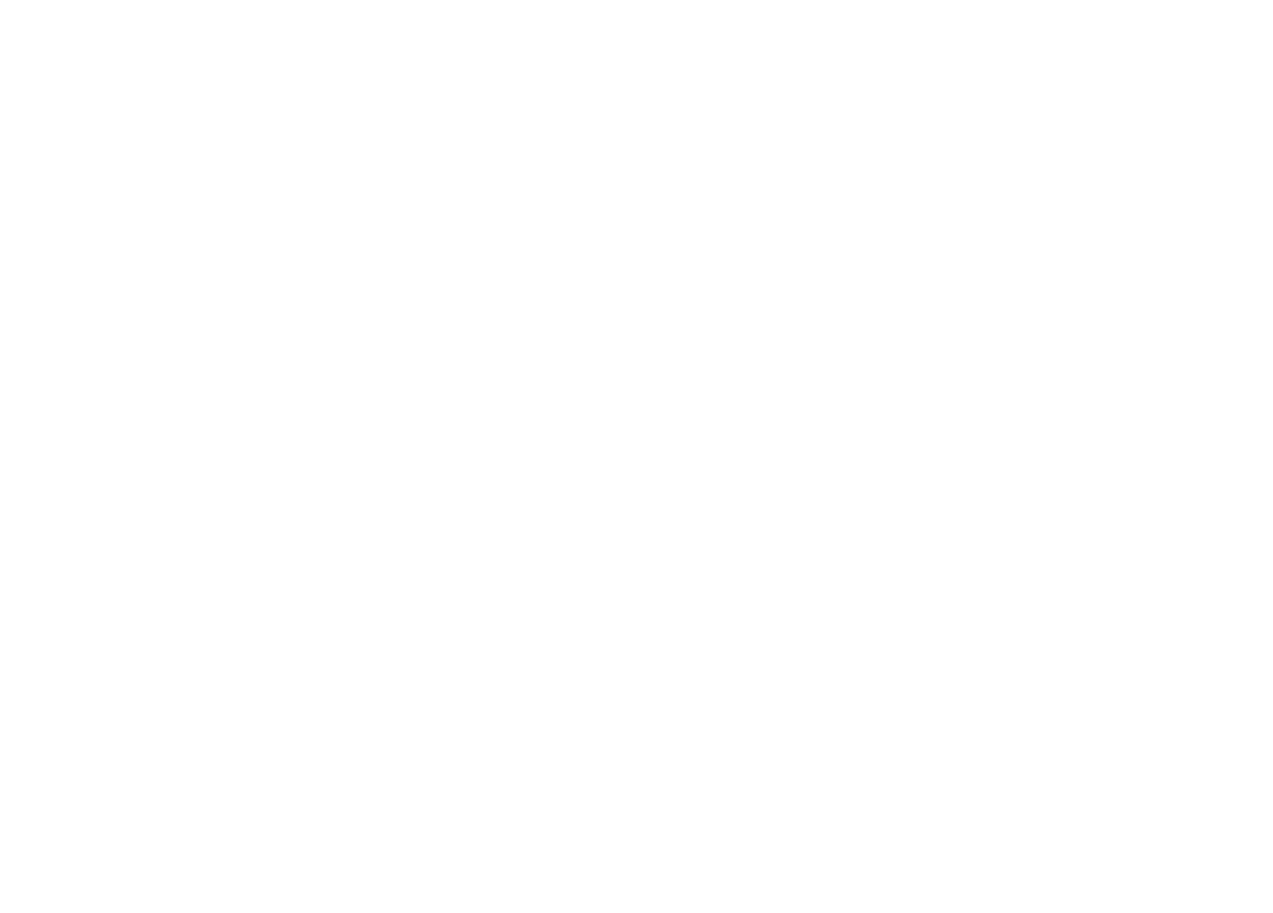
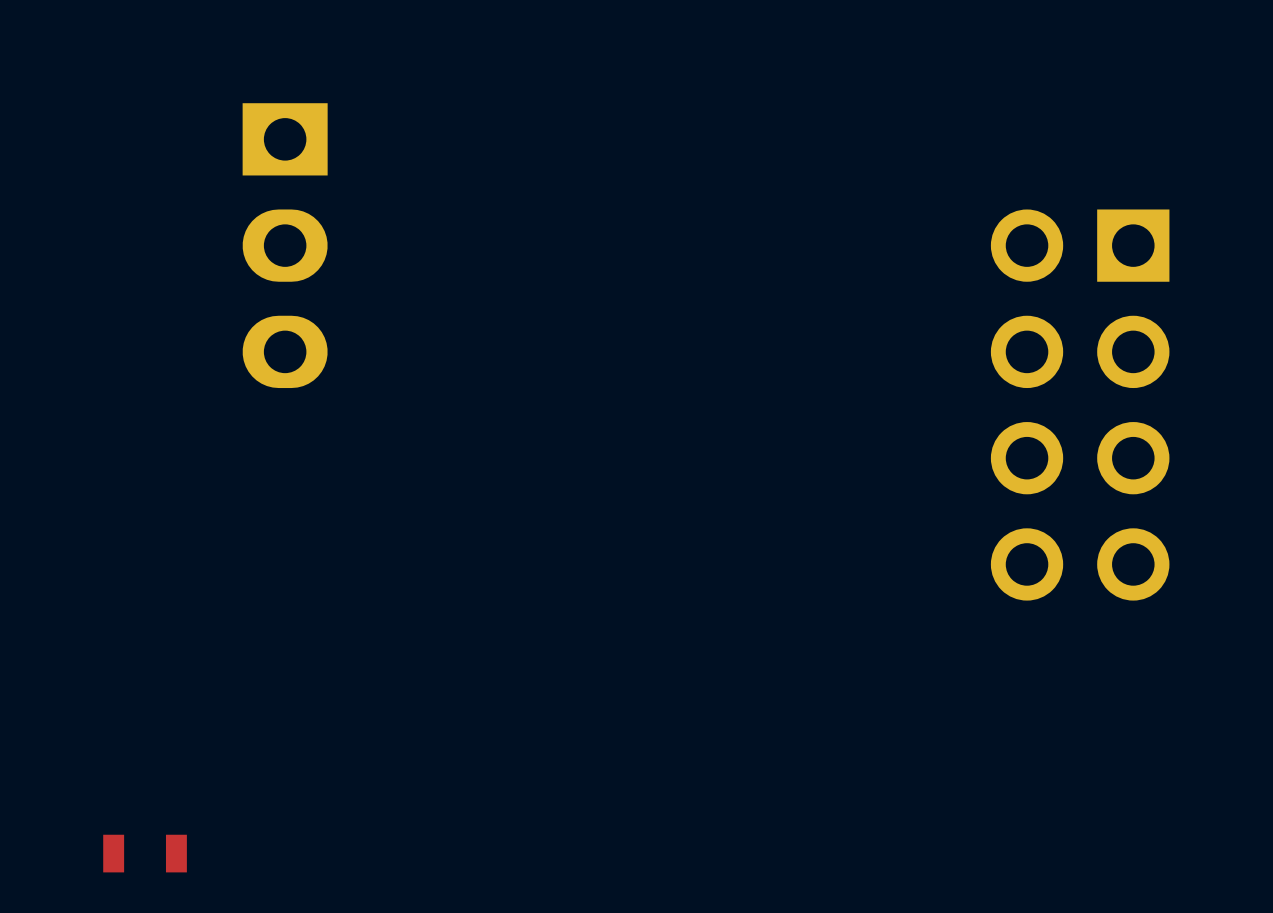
part: none -> (285, 245)
part: none -> (1080, 405)
part: none -> (145, 853)

